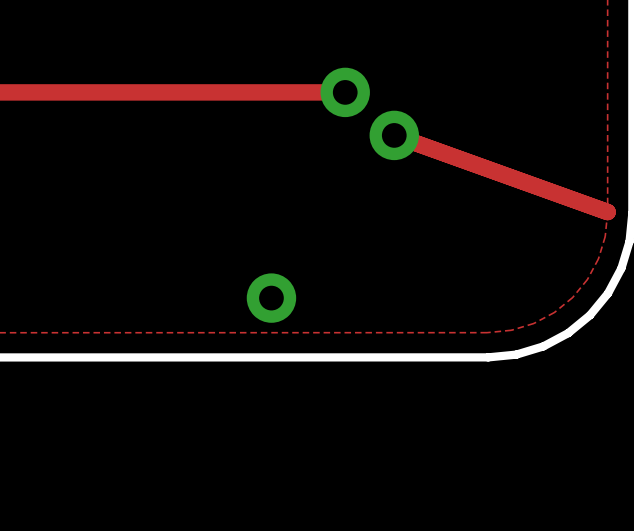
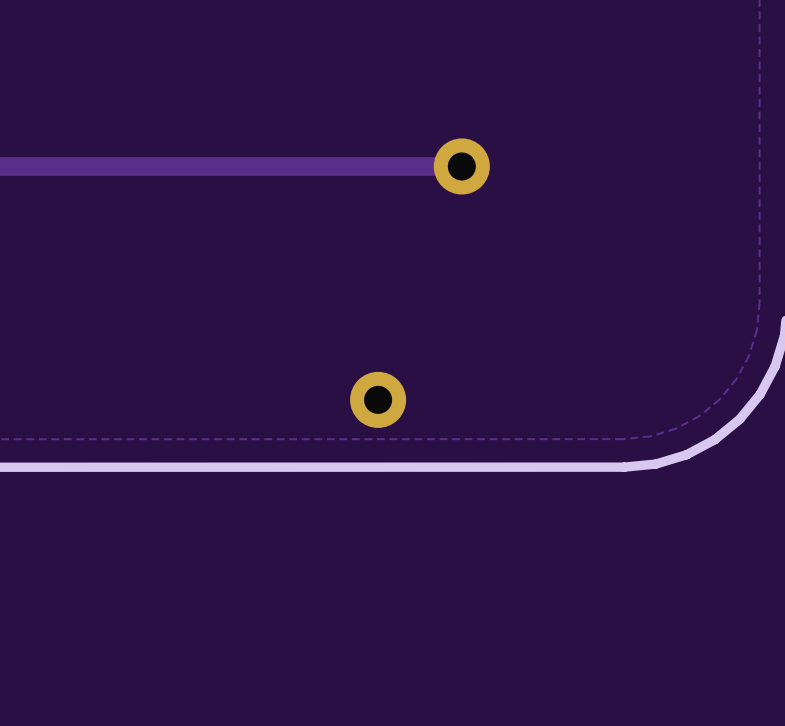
track: (394, 135) (607, 212) -> none
via: (394, 135) -> none

